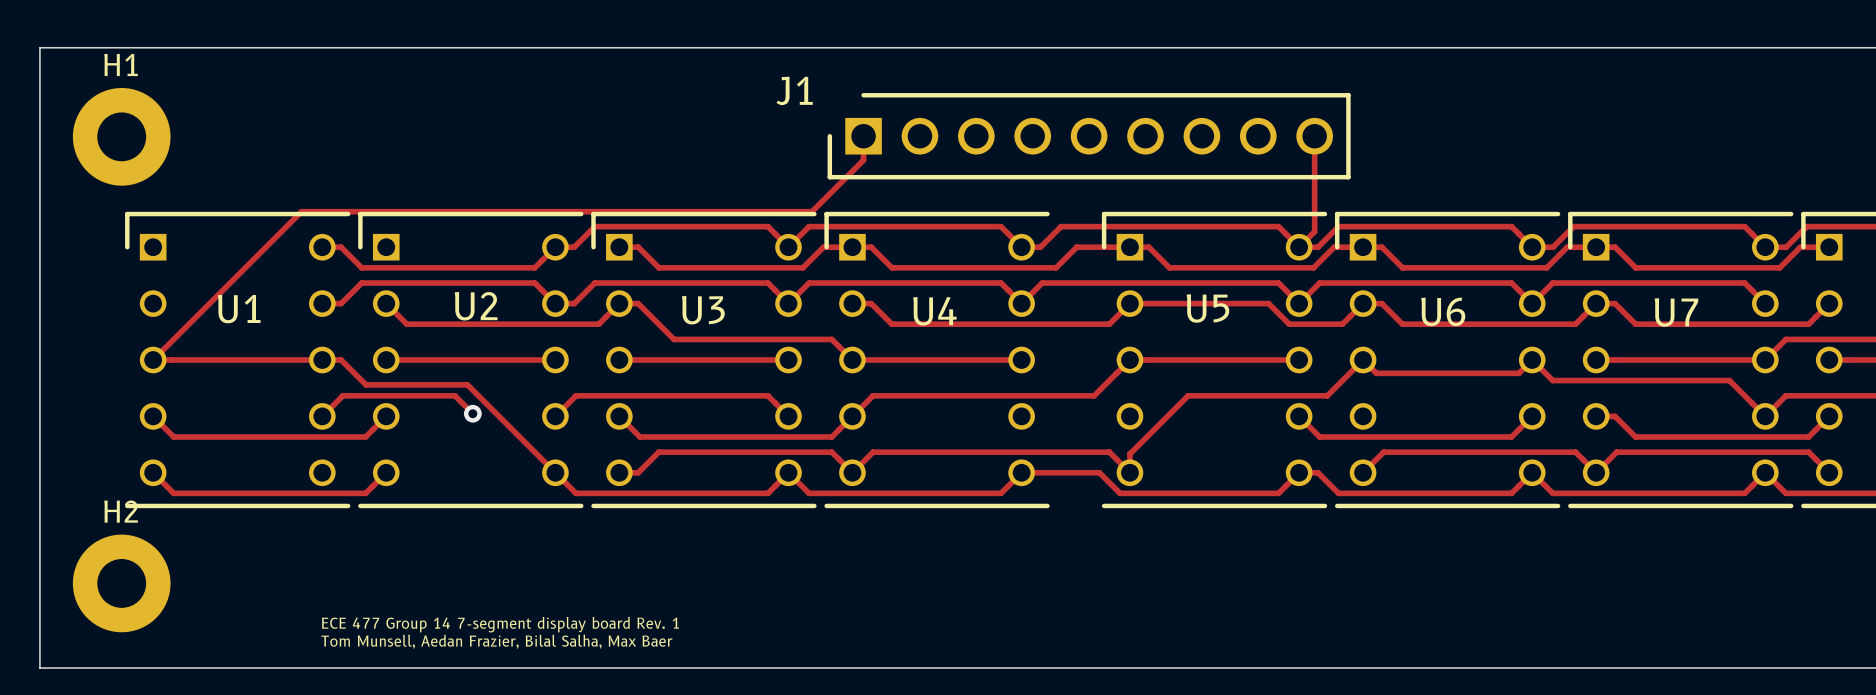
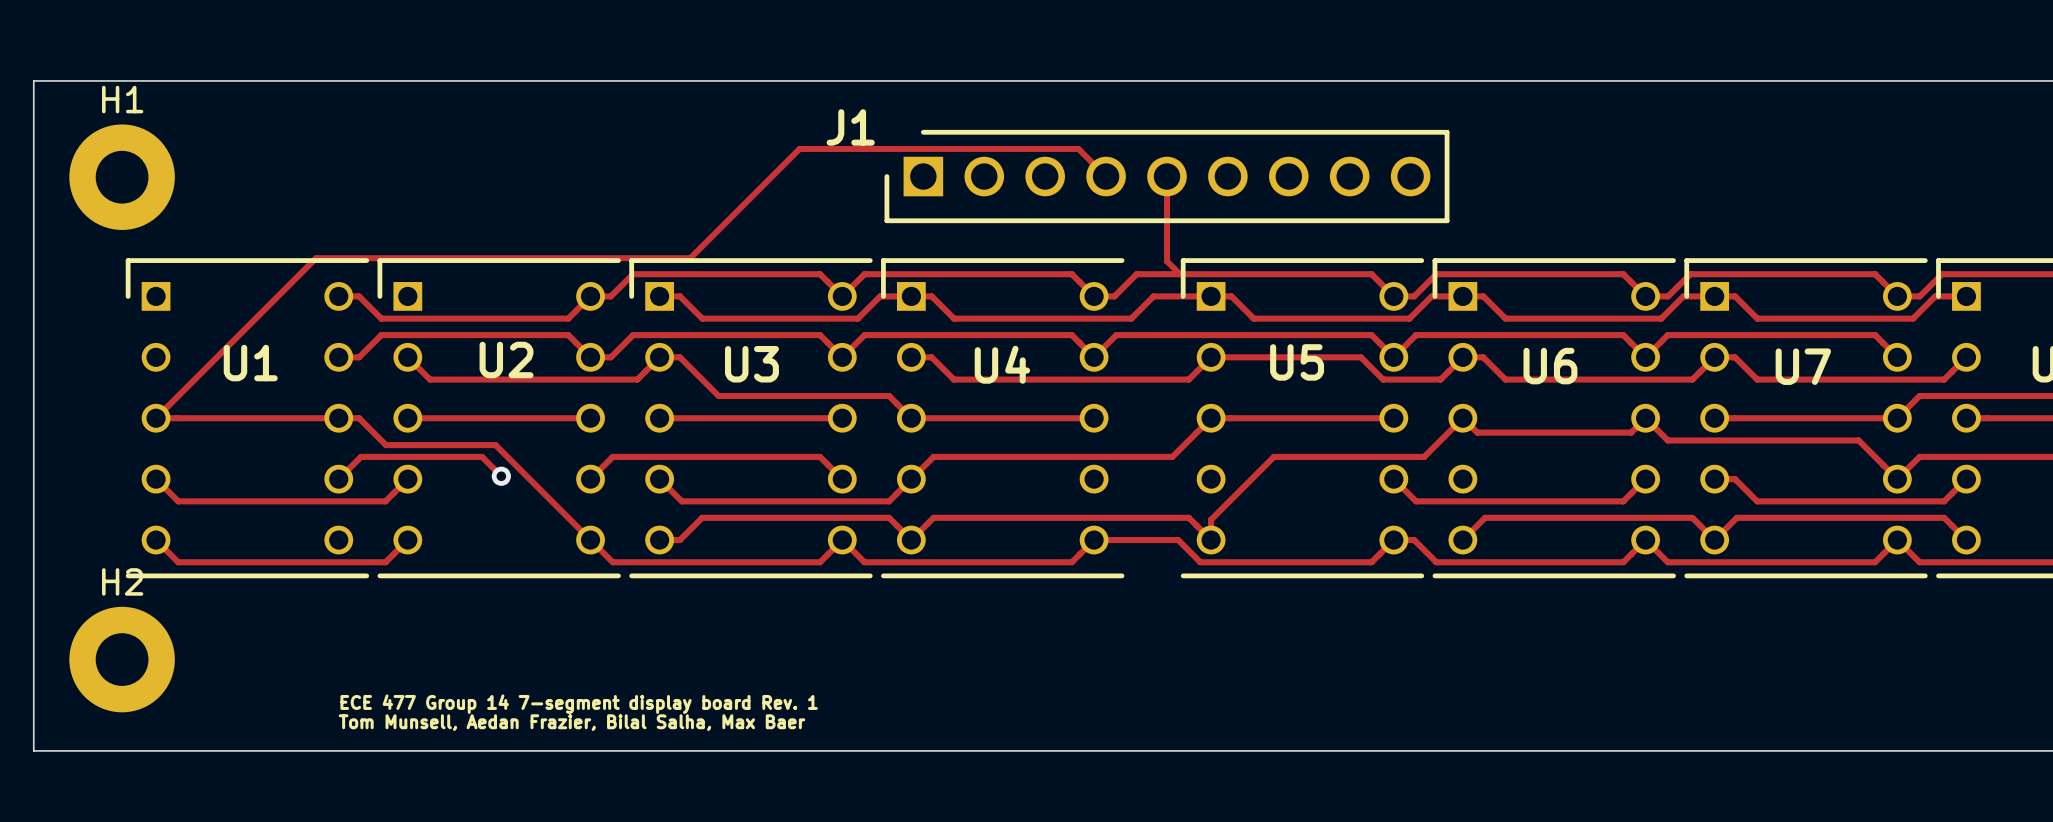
track: (863, 136) (863, 160) (812, 211) (301, 211) -> (1106, 176) (1078, 148) (799, 148) (690, 258) (316, 258)
track: none -> (1166, 176) (1166, 261) (1179, 274)
track: (1314, 136) (1314, 231) (1299, 247) -> none

